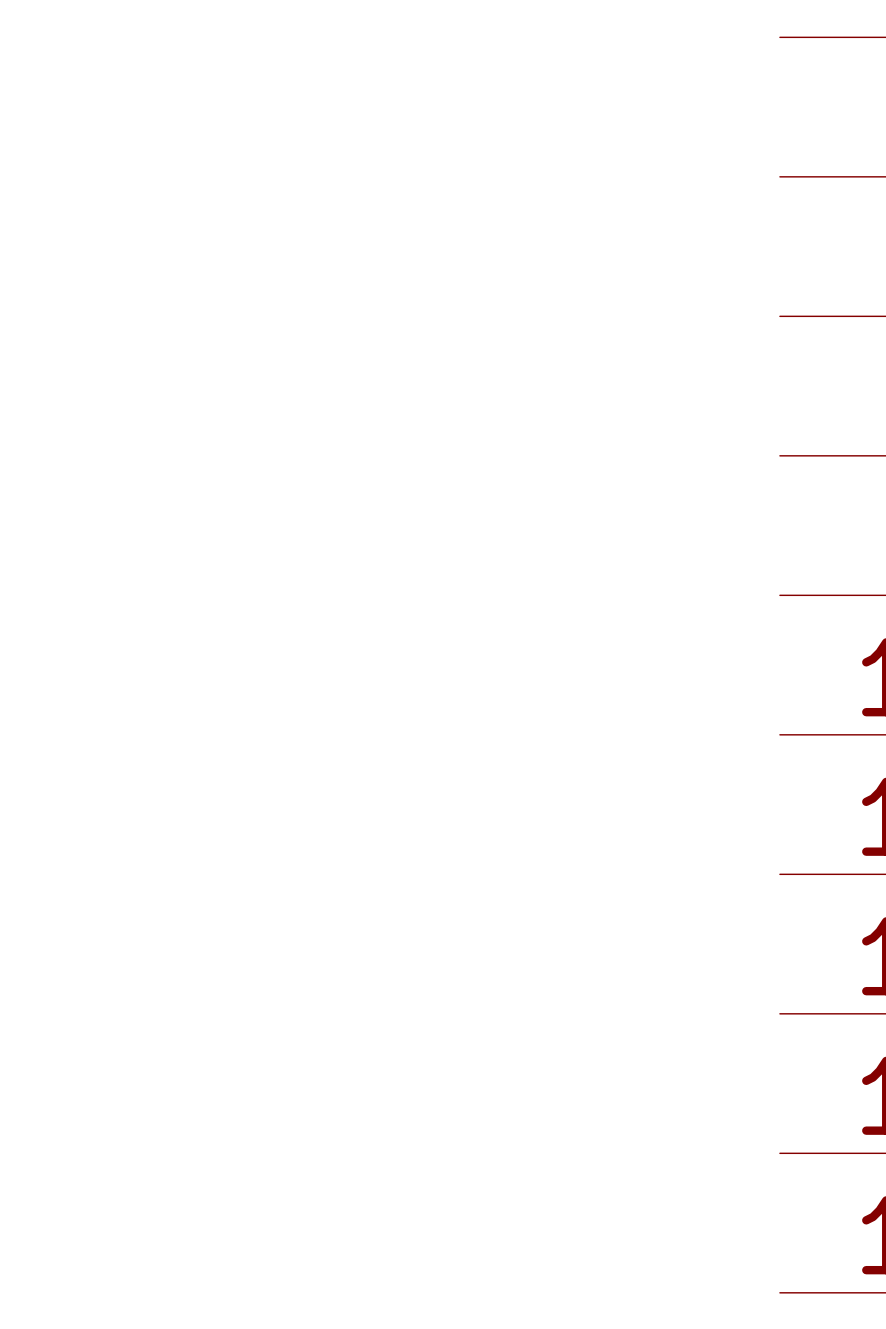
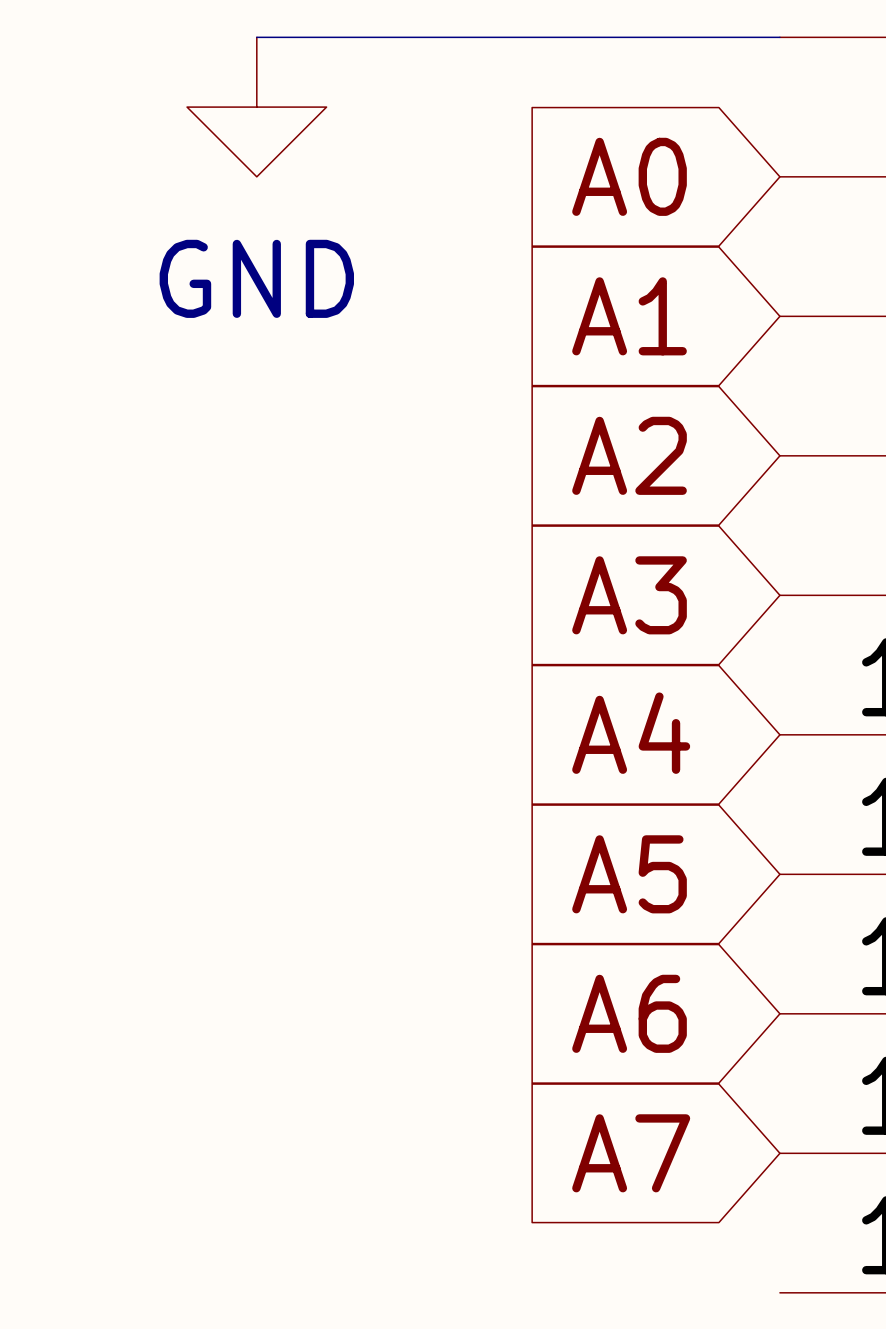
wire: none -> (256, 37) (779, 37)
power symbol: none -> GND (256, 107)
global label: none -> A0 (629, 176)
global label: none -> A1 (629, 316)
global label: none -> A2 (629, 455)
global label: none -> A3 (629, 595)
global label: none -> A4 (631, 733)
global label: none -> A5 (629, 874)
global label: none -> A6 (629, 1013)
global label: none -> A7 (631, 1153)

